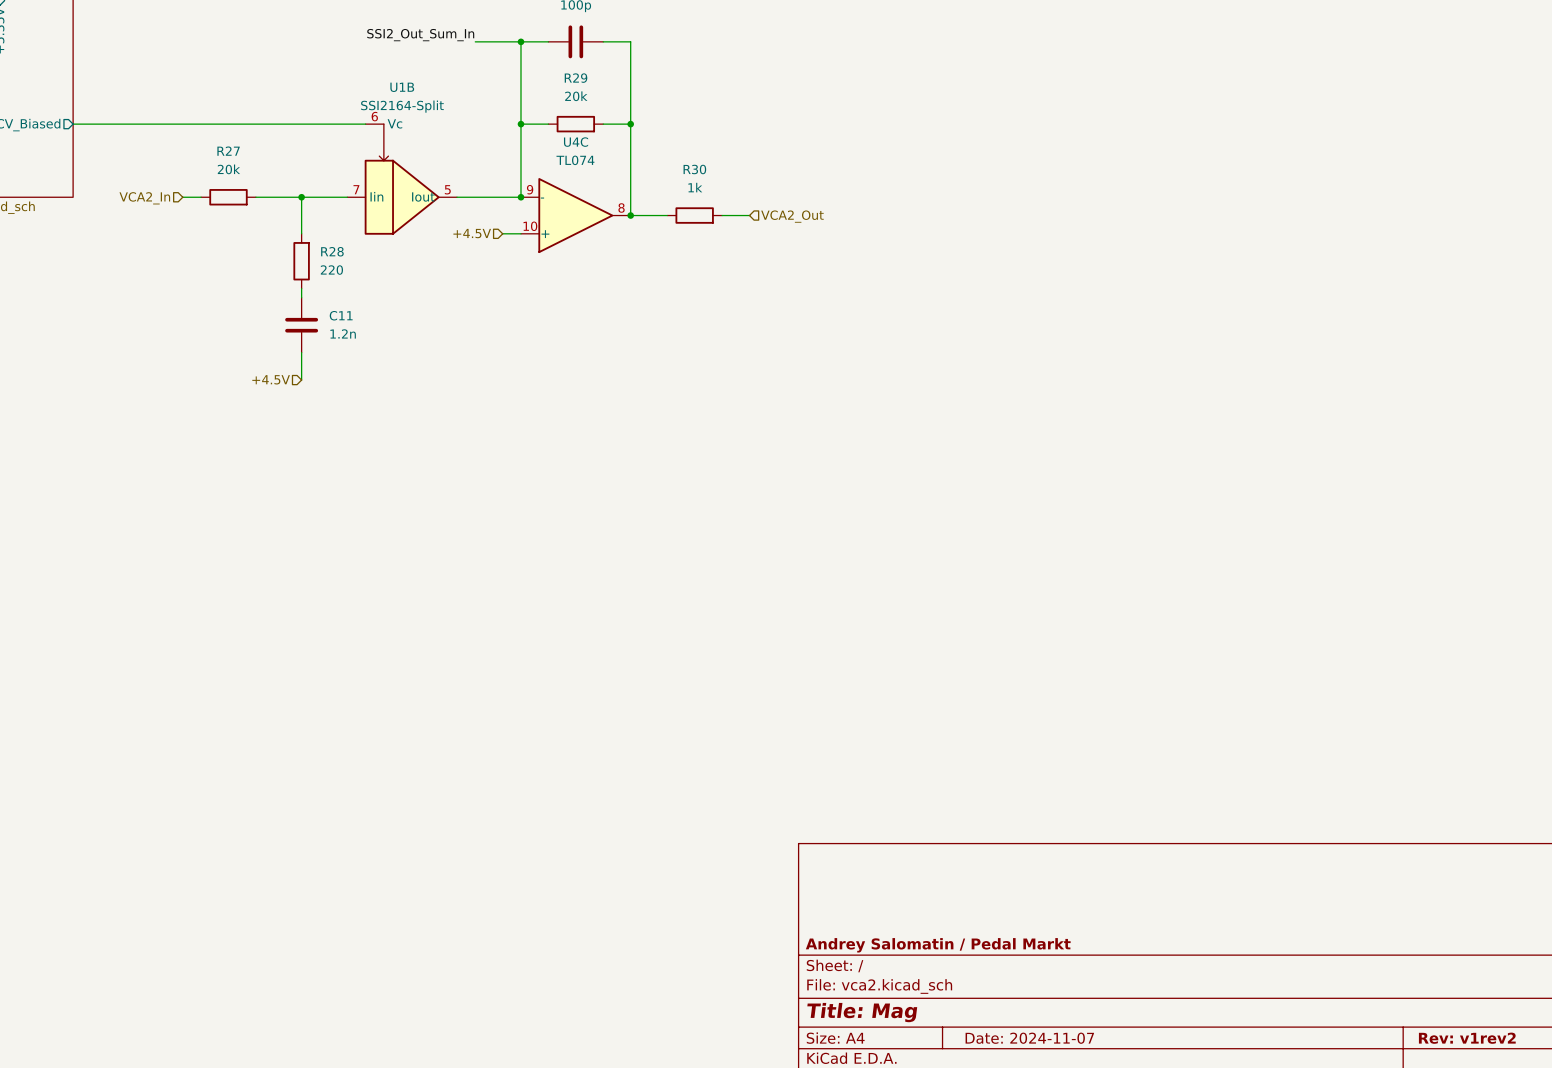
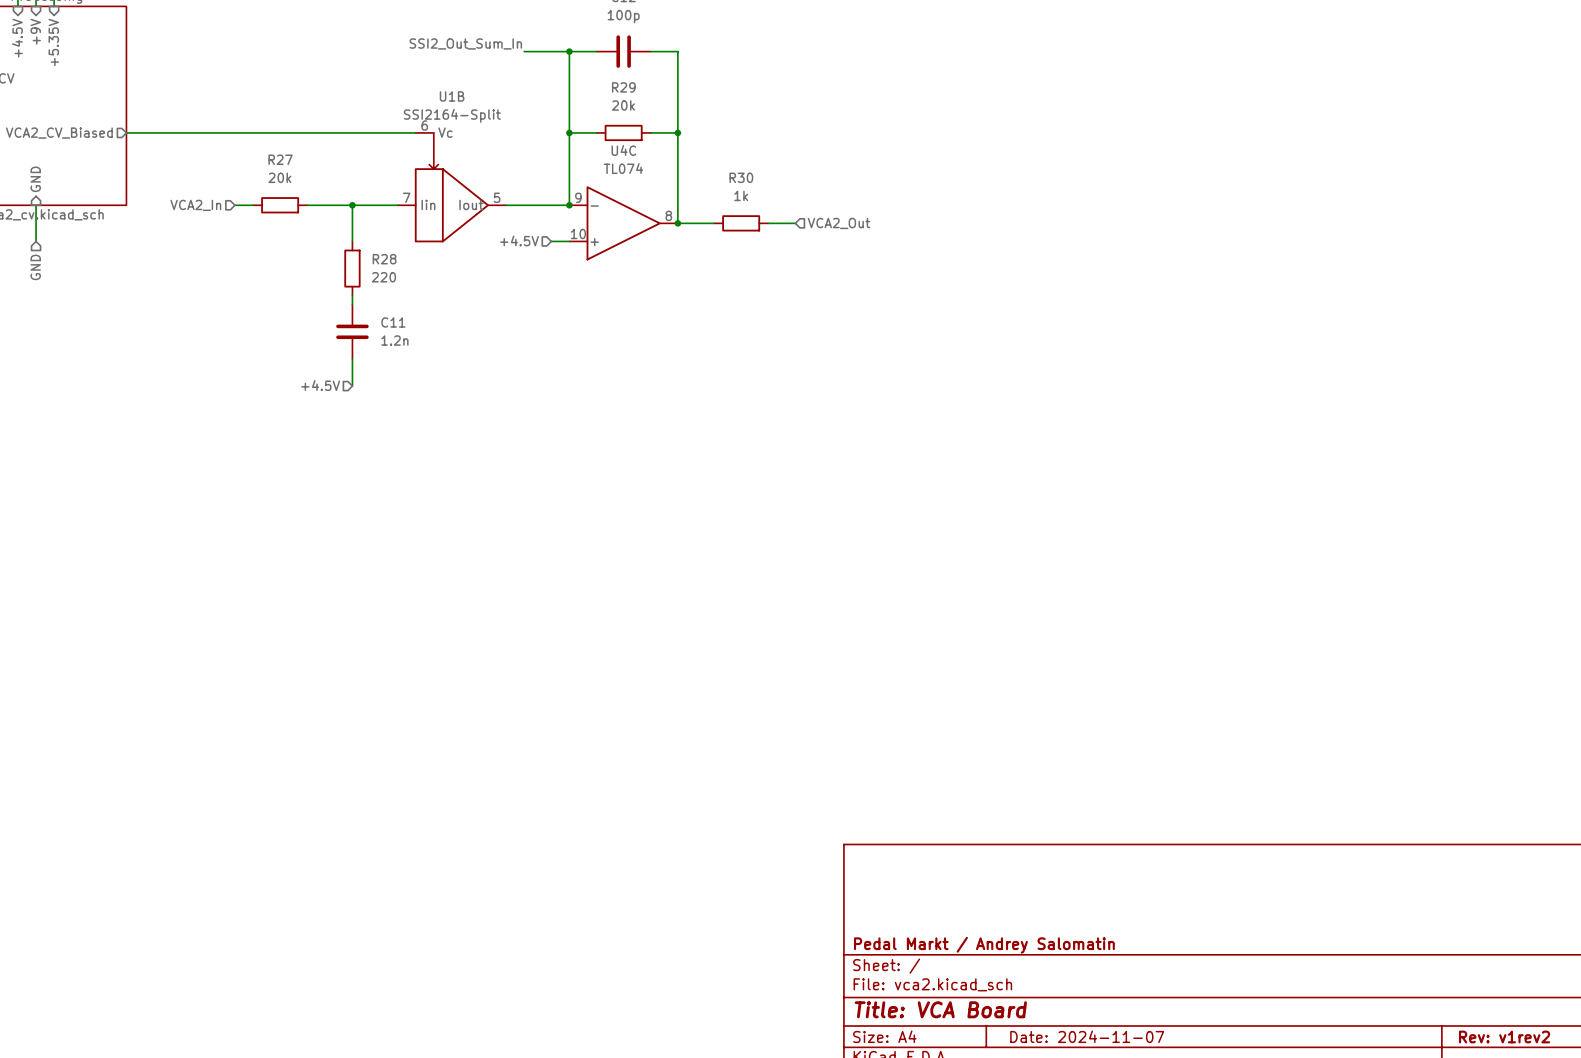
title block: Andrey Salomatin / Pedal Markt (938, 945) -> Pedal Markt / Andrey Salomatin (984, 945)
title block: Title: Mag (862, 1012) -> Title: VCA Board (940, 1009)

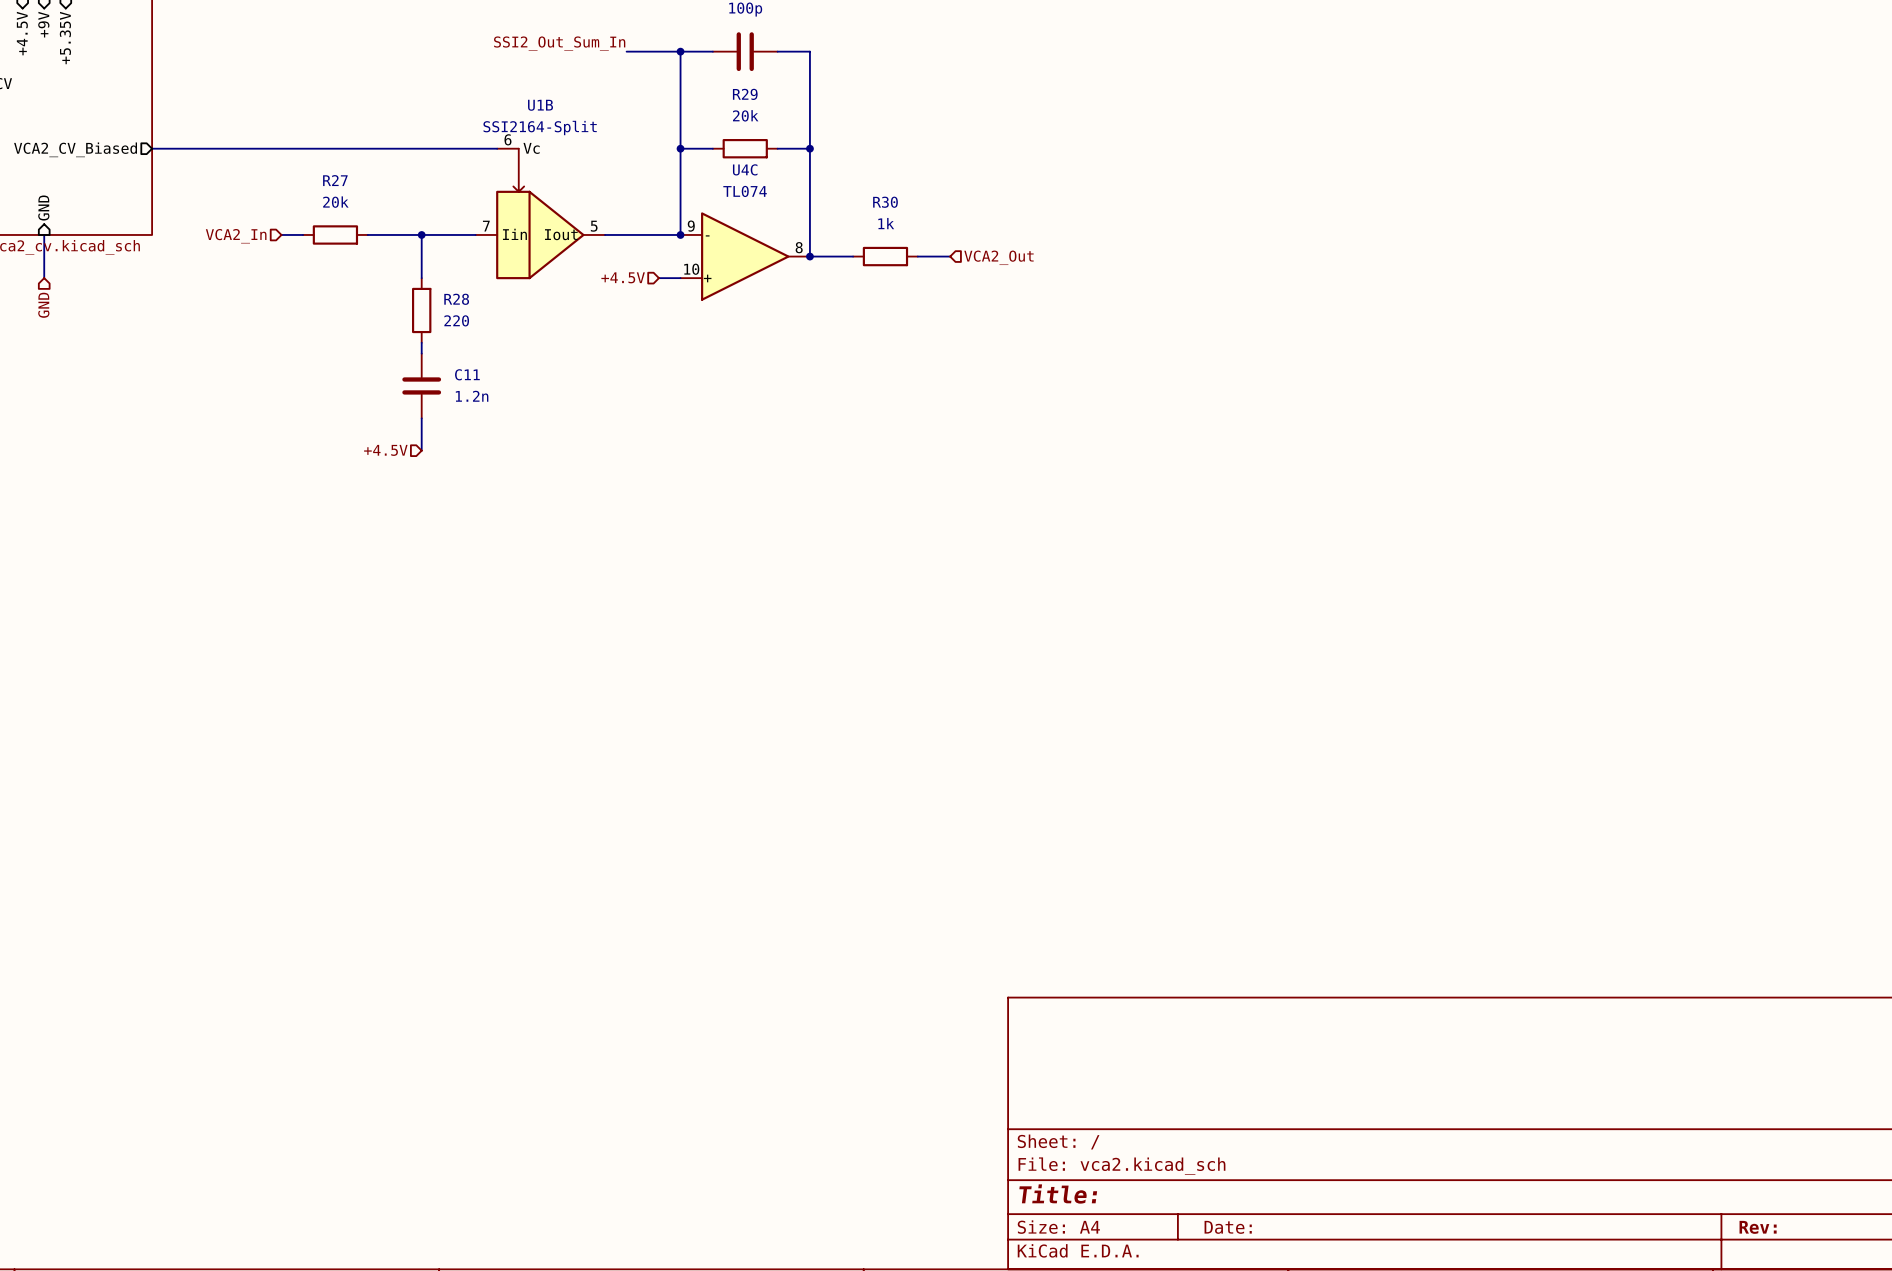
title block: Pedal Markt / Andrey Salomatin (984, 945) -> none
title block: Title: VCA Board (940, 1009) -> Title: (1058, 1194)
title block: Date: 2024-11-07 (1087, 1036) -> Date: (1228, 1227)
title block: Rev: v1rev2 (1504, 1036) -> Rev: (1758, 1227)

